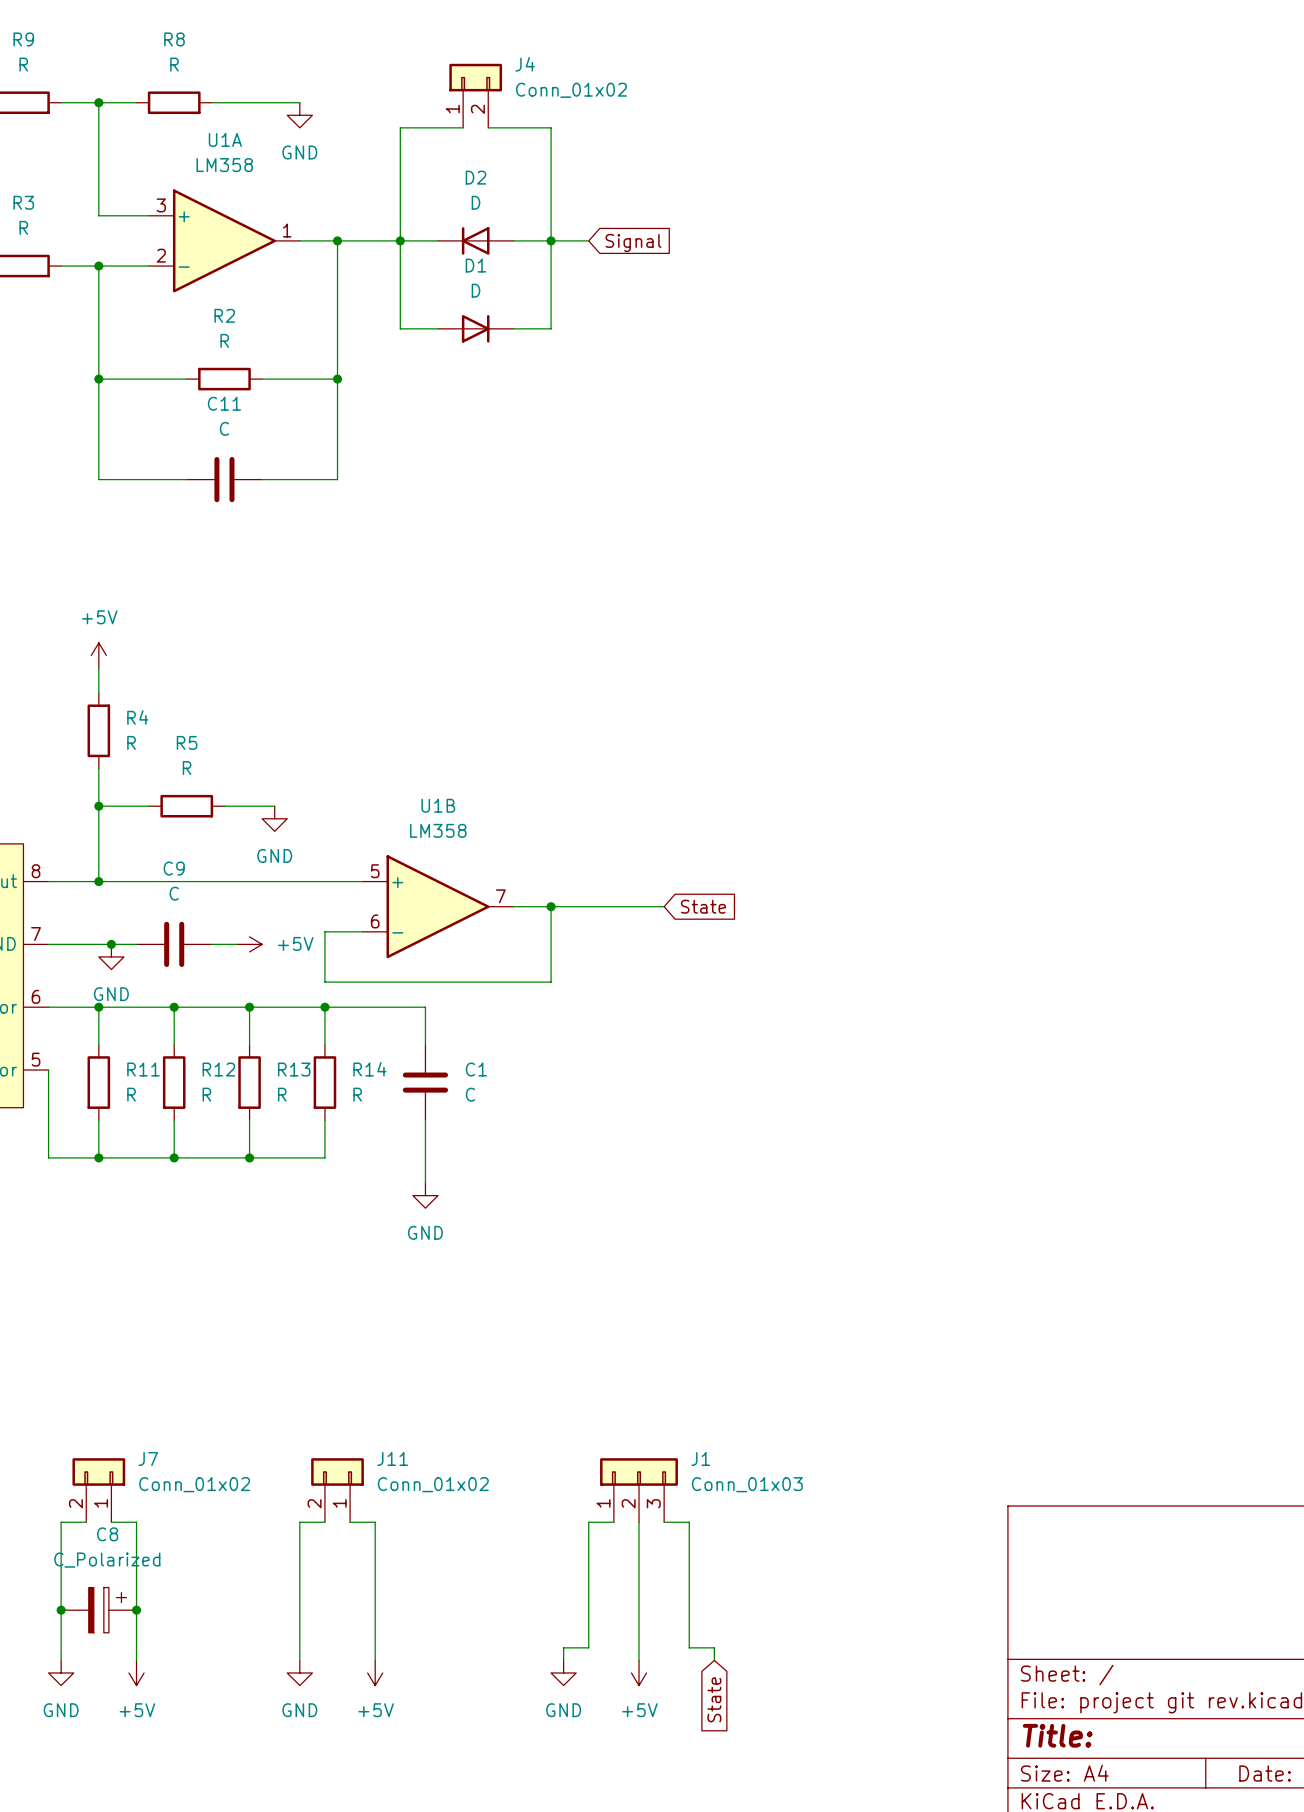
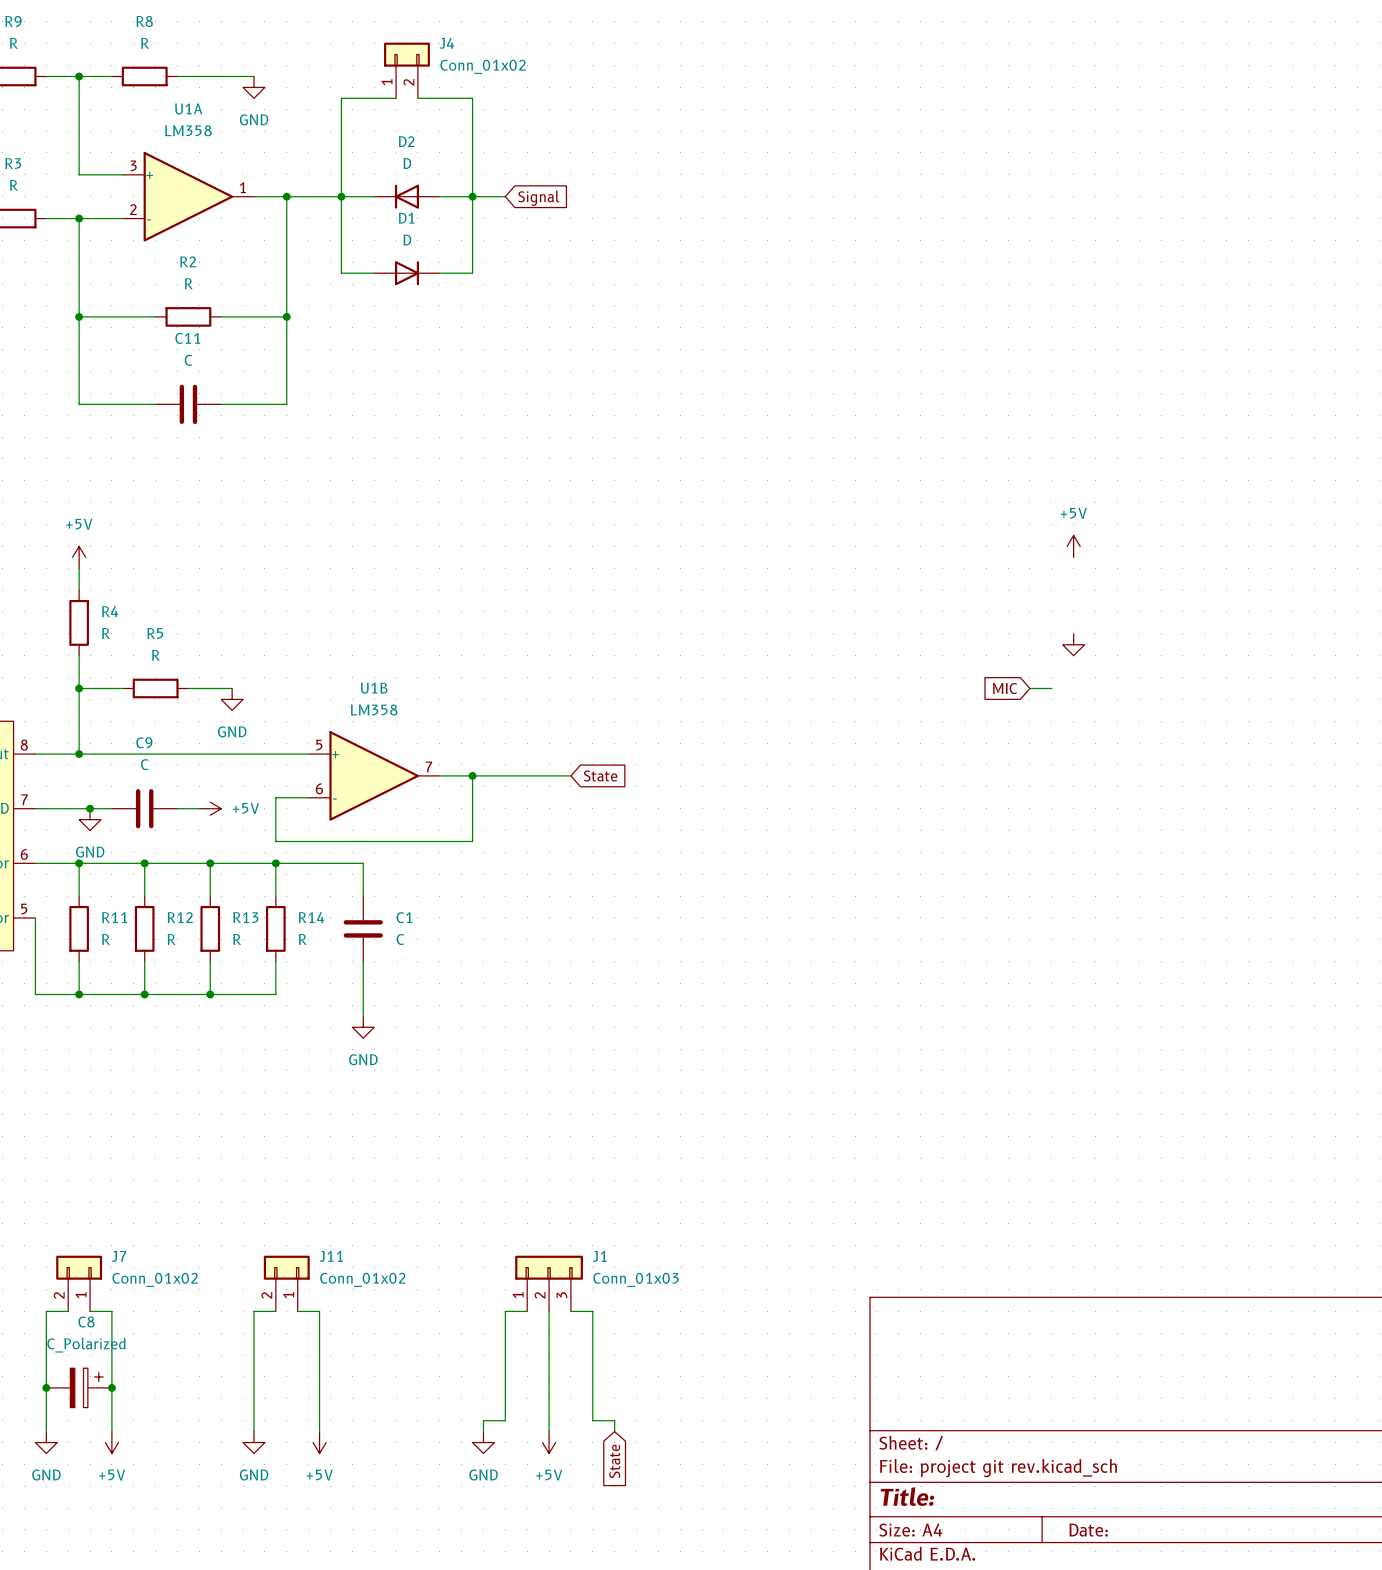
power symbol: none -> +5V (1073, 546)
power symbol: none -> (1073, 644)
global label: none -> MIC (1005, 688)
wire: none -> (1029, 688) (1051, 688)

